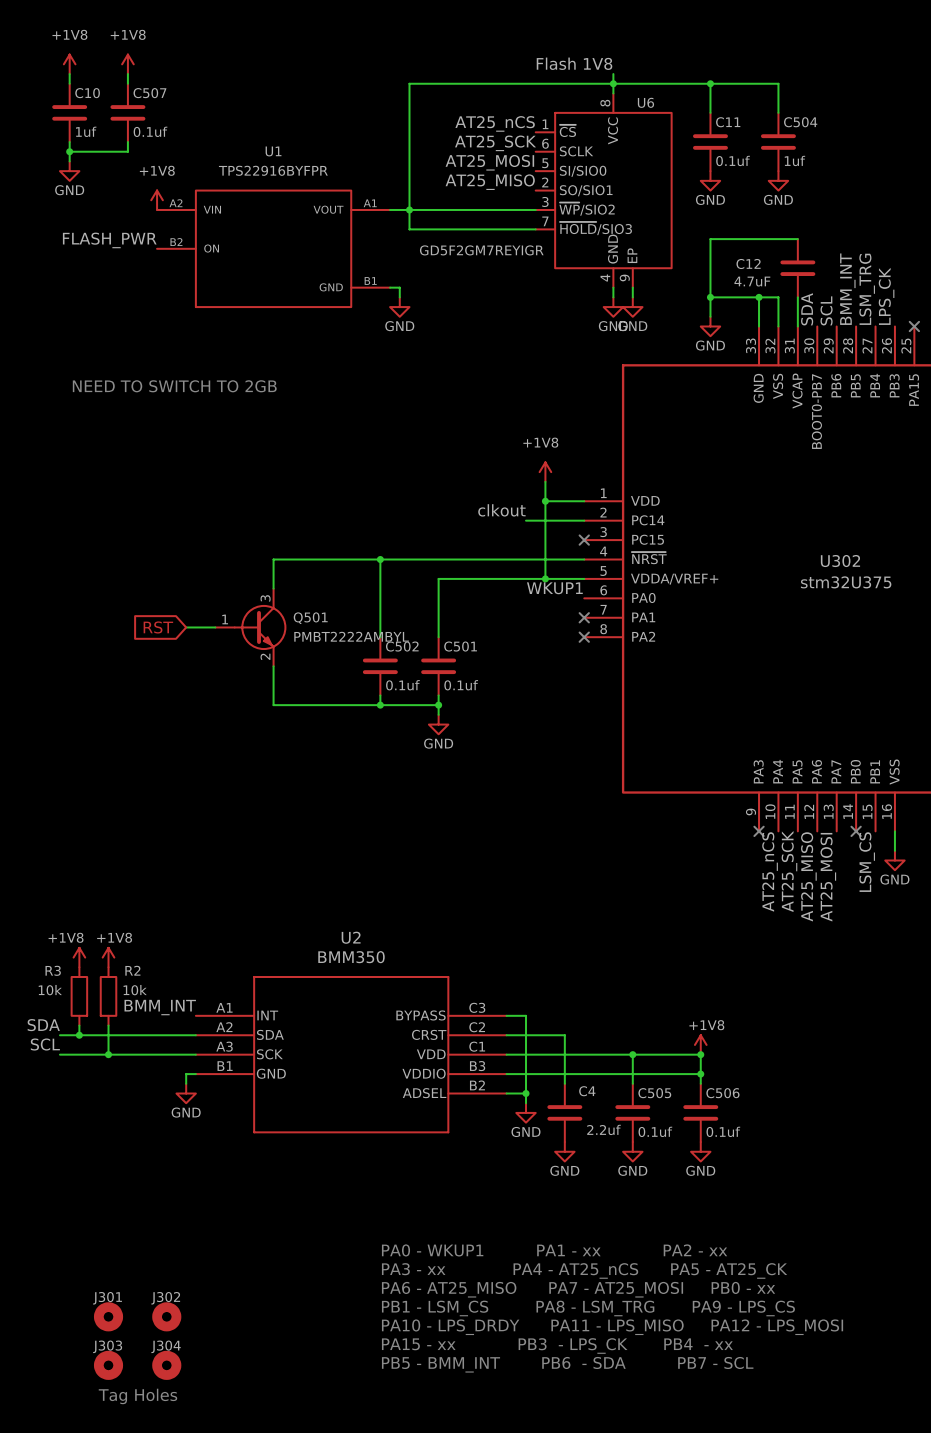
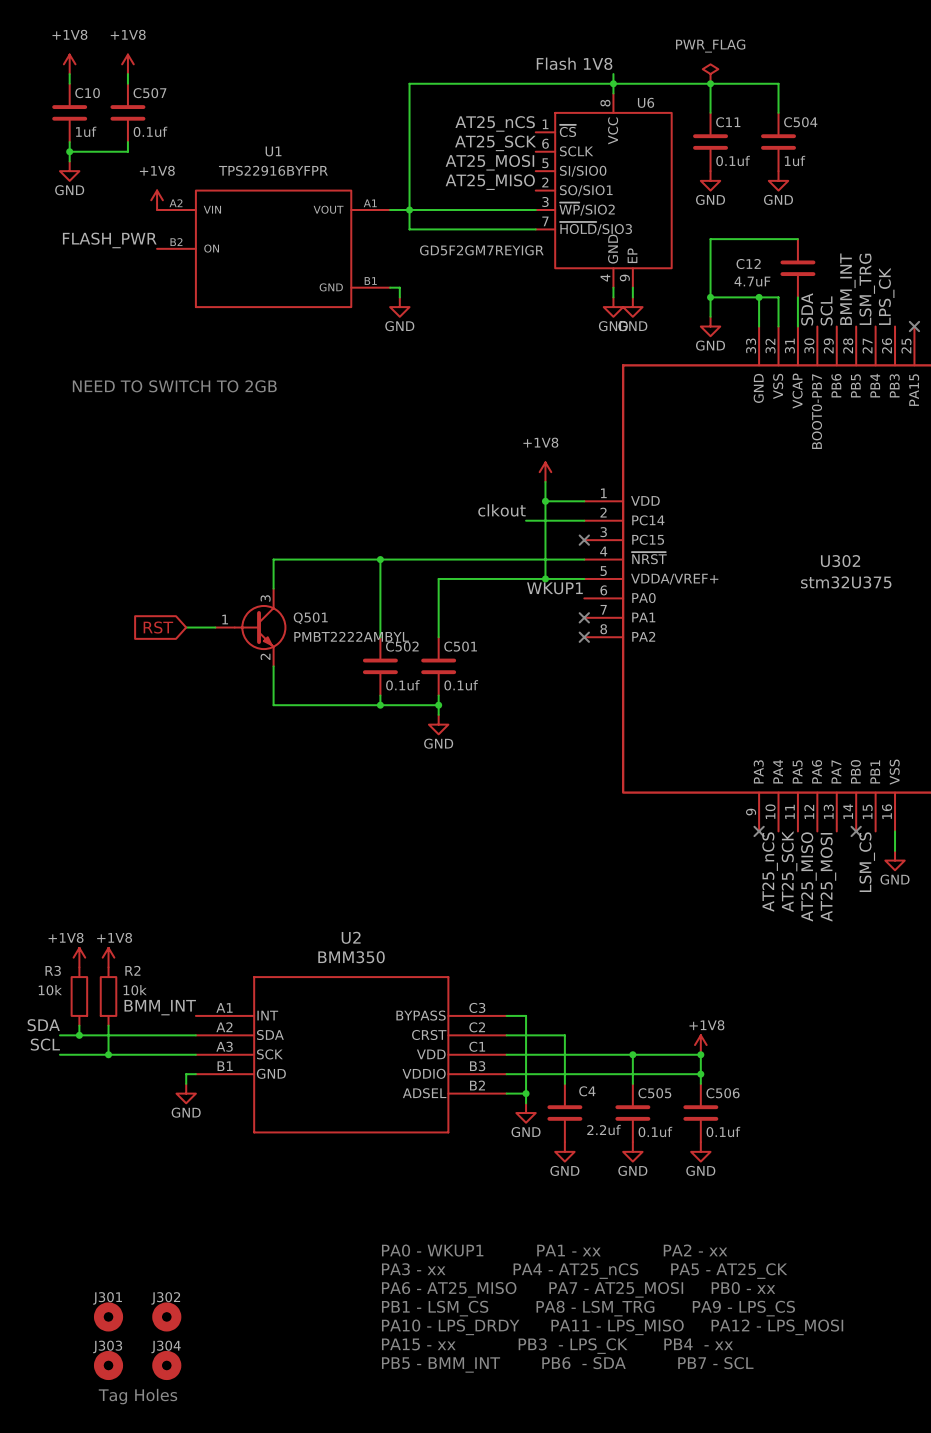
power symbol: none -> PWR_FLAG (710, 74)

